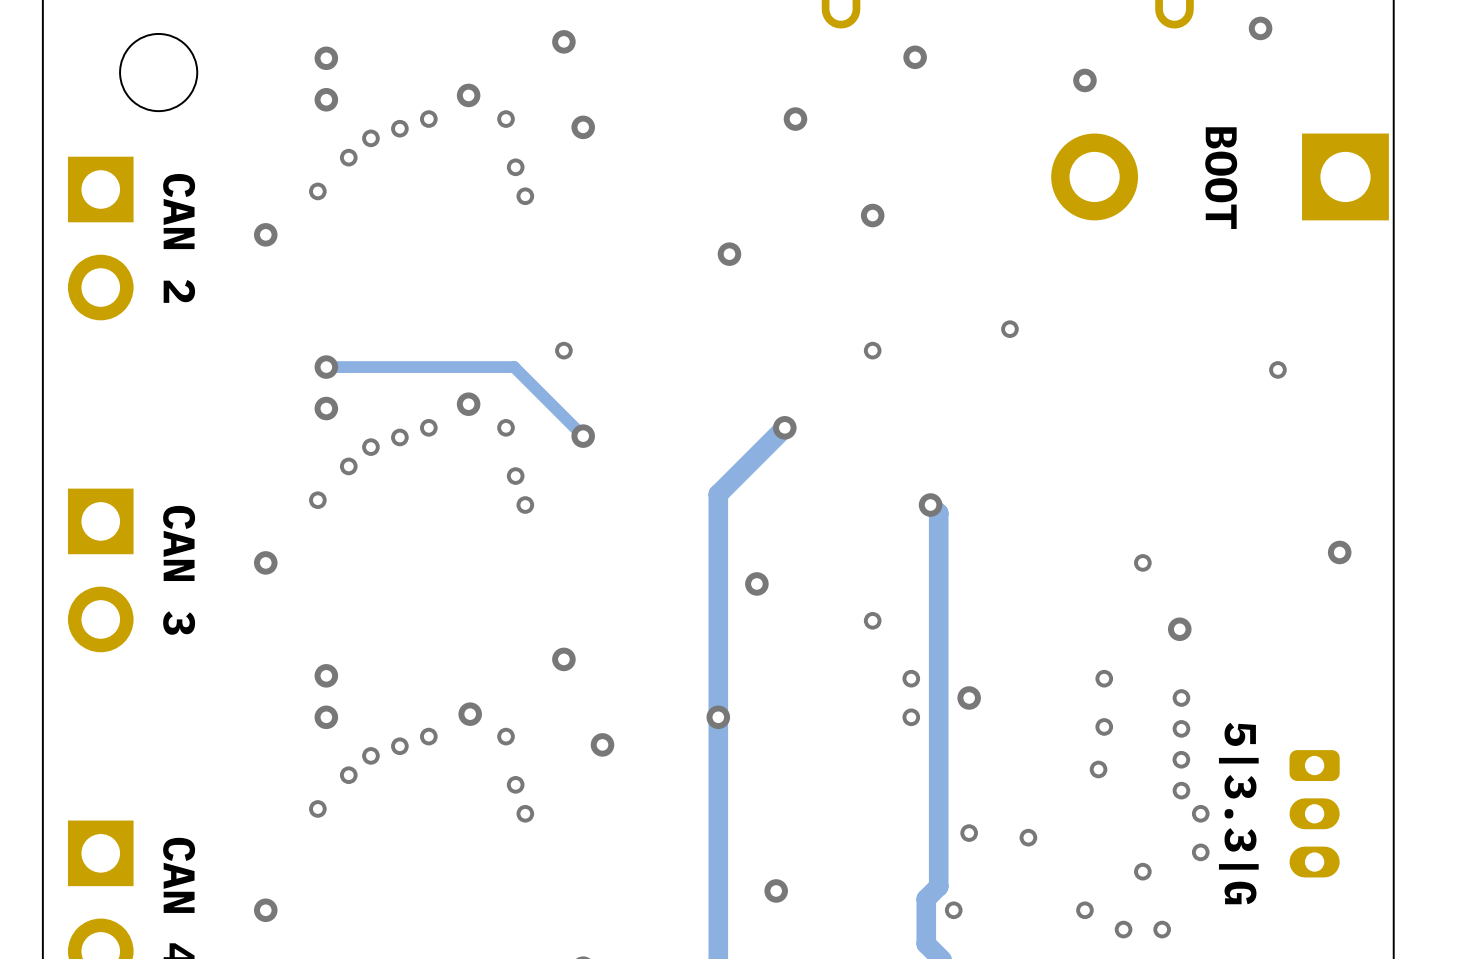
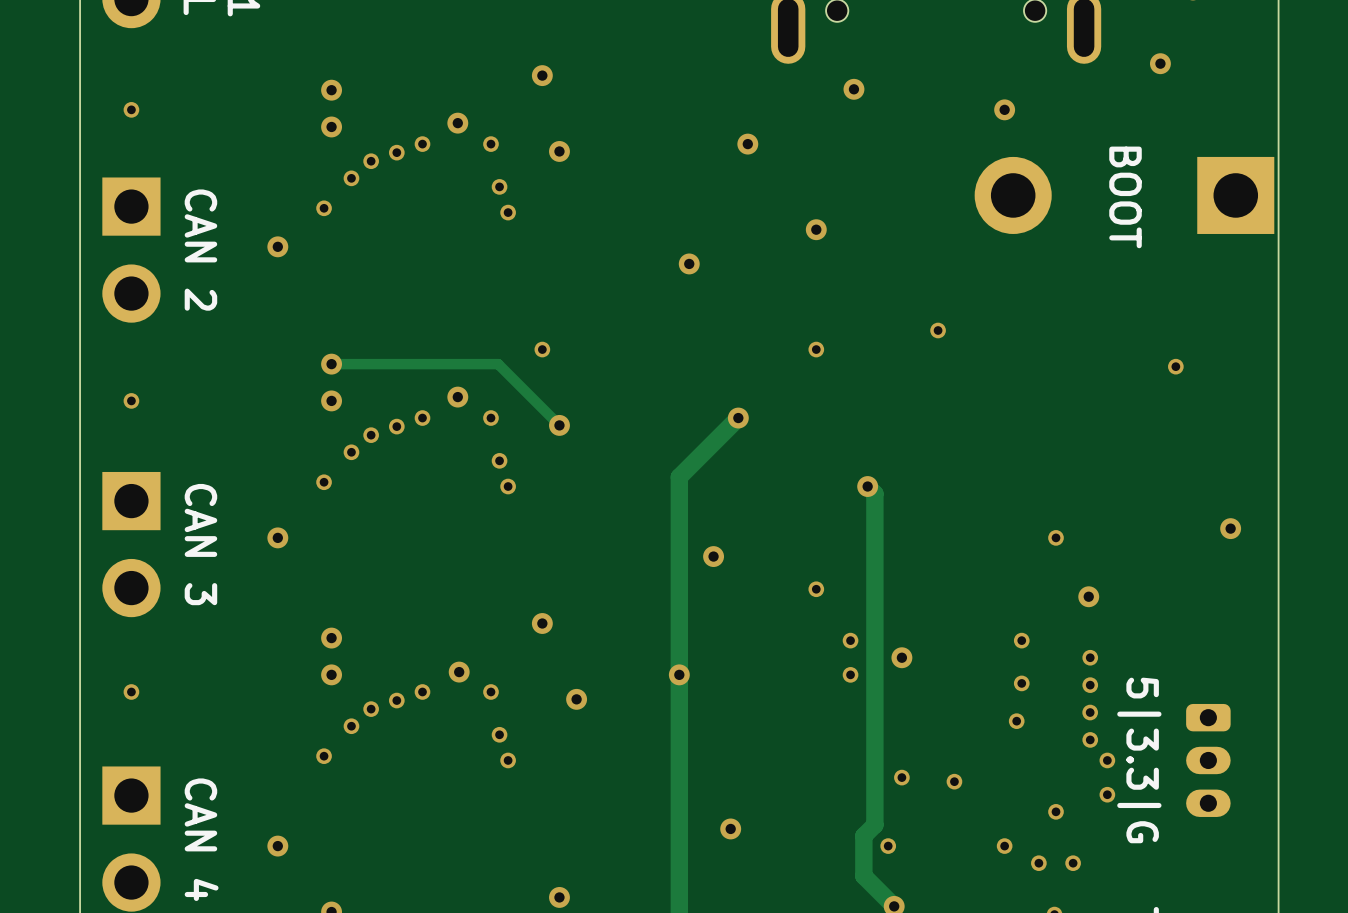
round board edge: [119, 32, 199, 113] -> none
via: none -> (131, 109)
via: none -> (131, 400)
via: none -> (131, 691)

